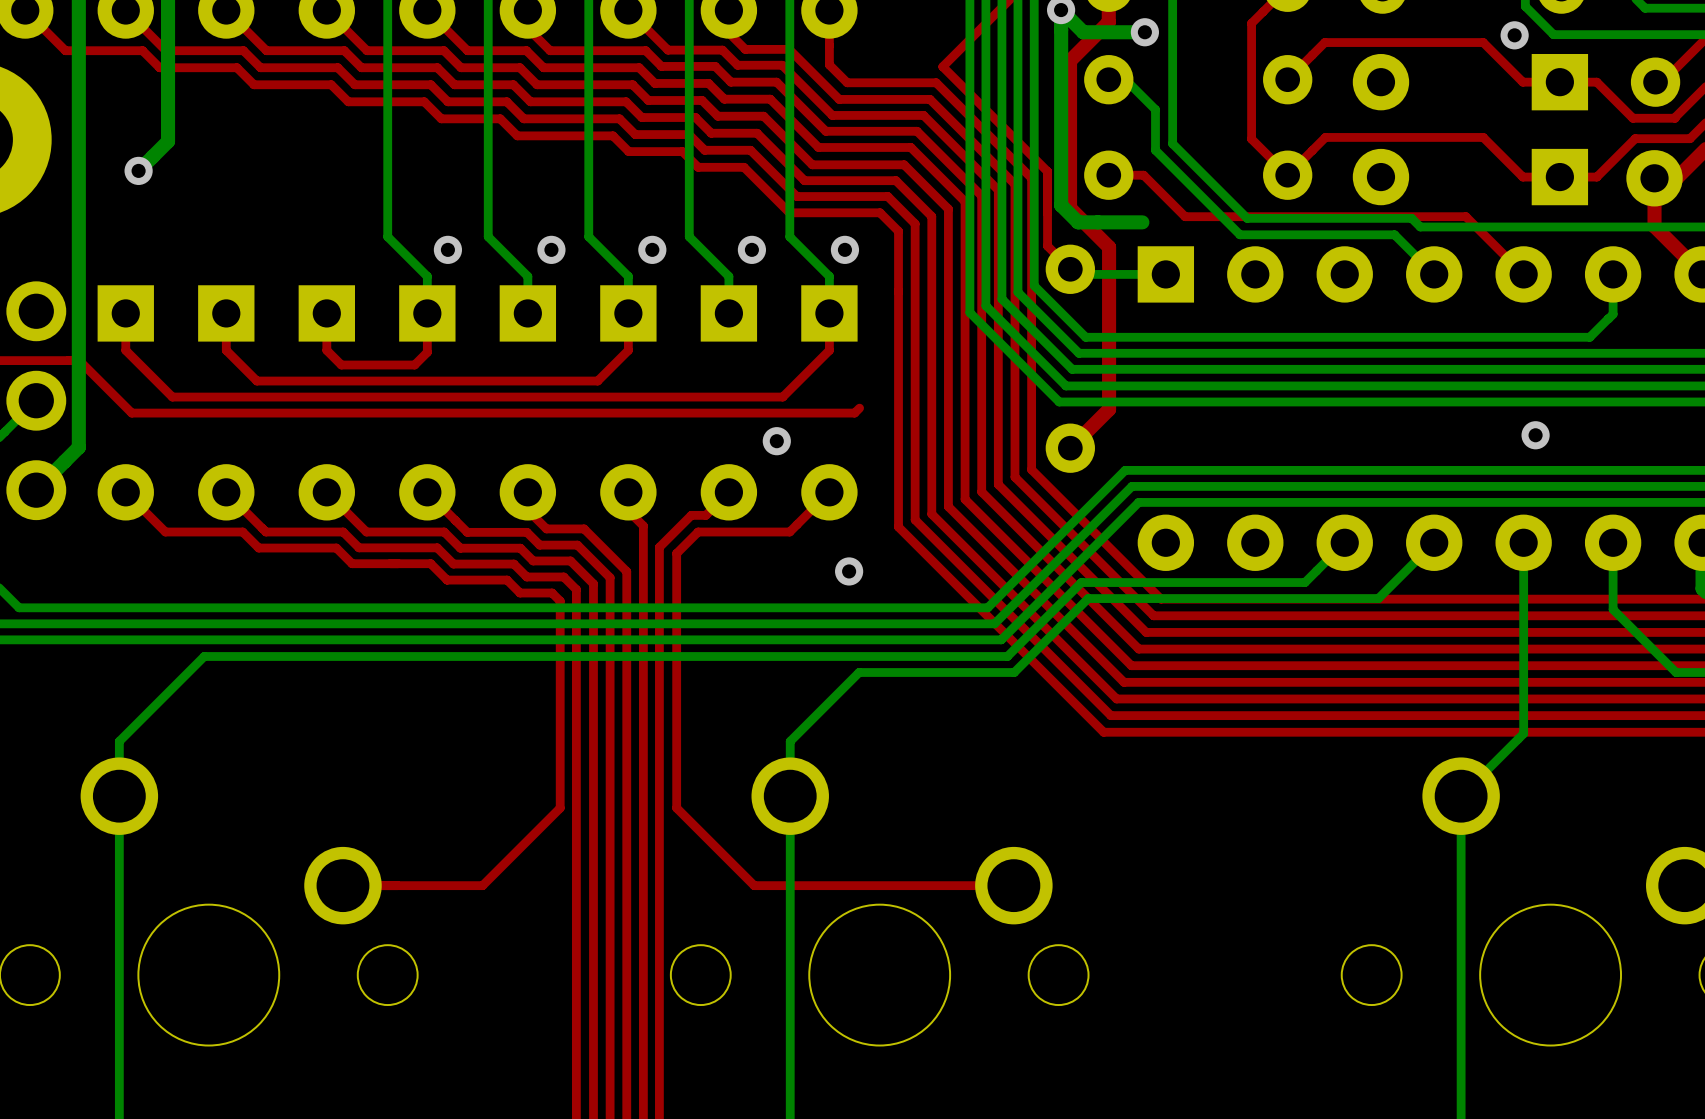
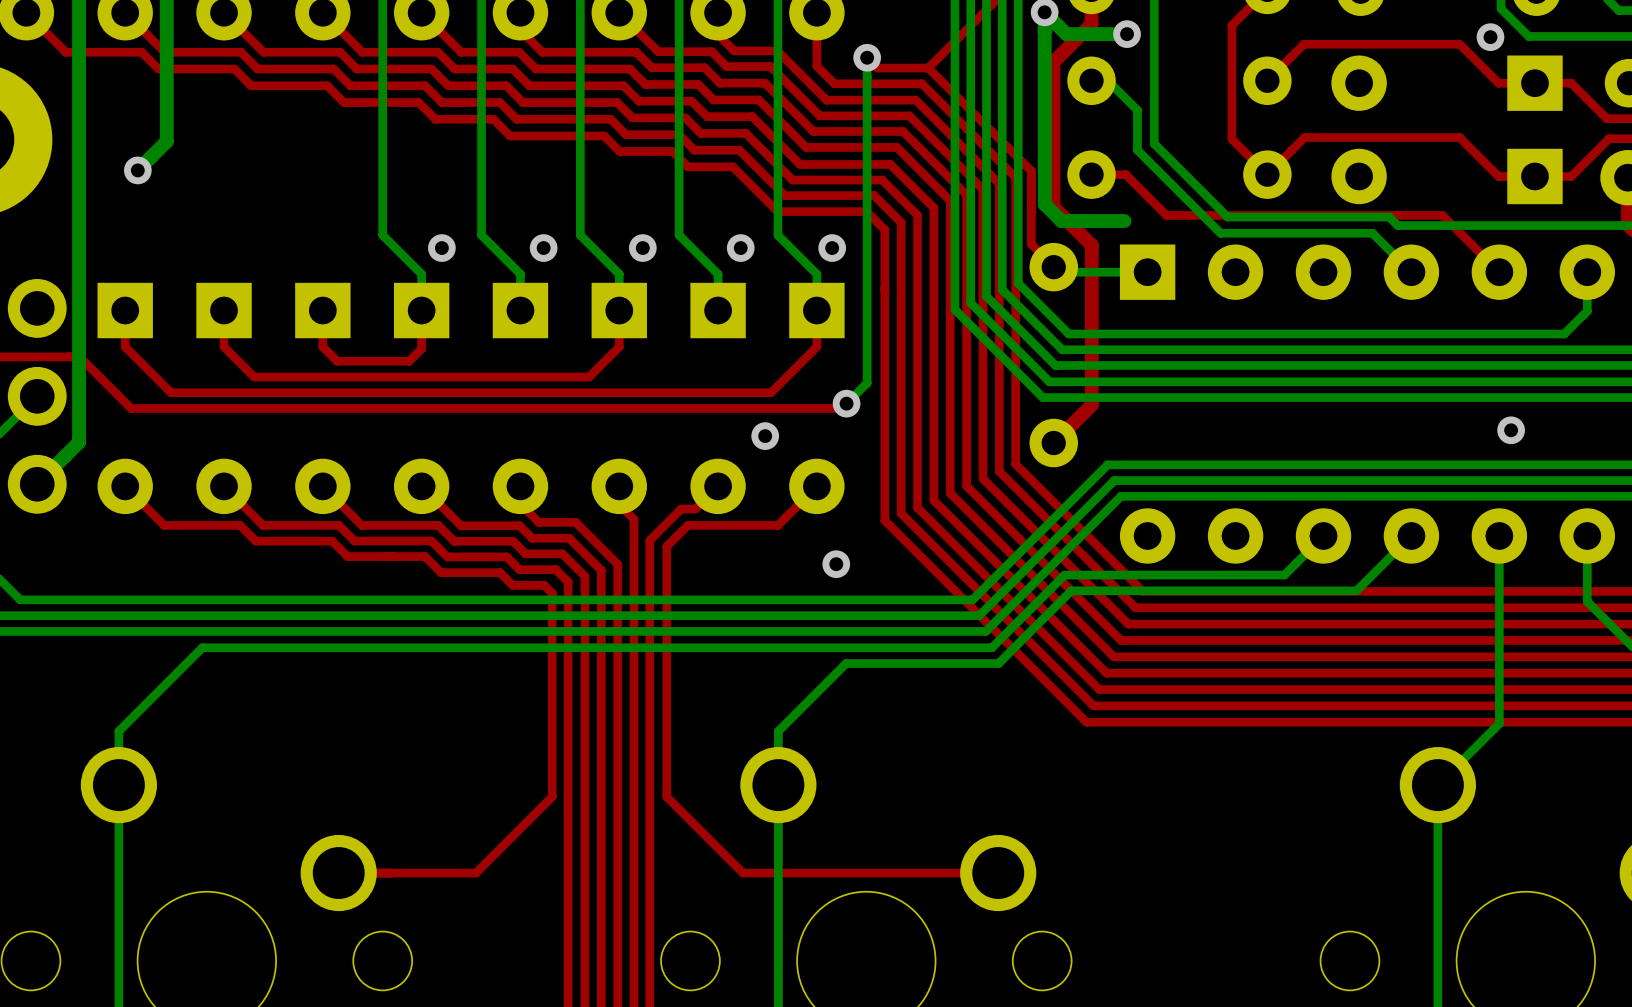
top track: none -> (867, 57) (877, 68) (928, 68)
bottom track: none -> (867, 57) (867, 383) (846, 403)
via: none -> (867, 57)
via: none -> (846, 403)

